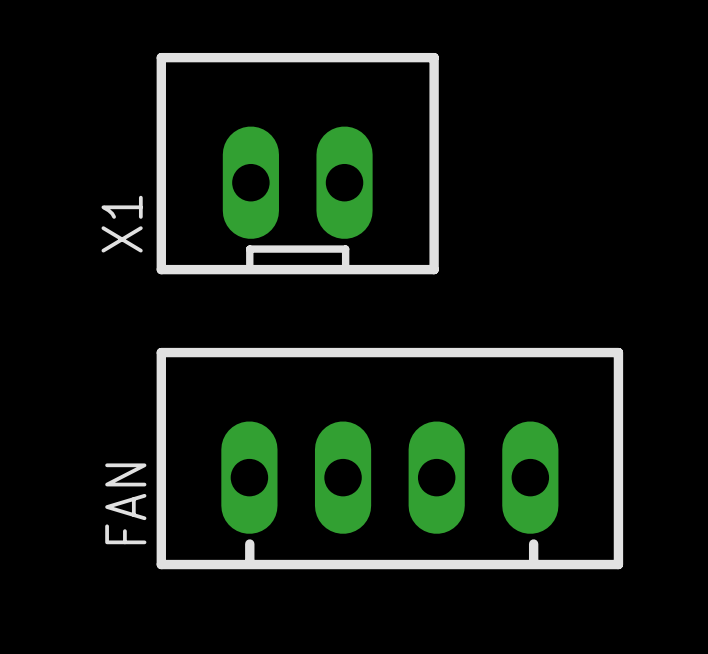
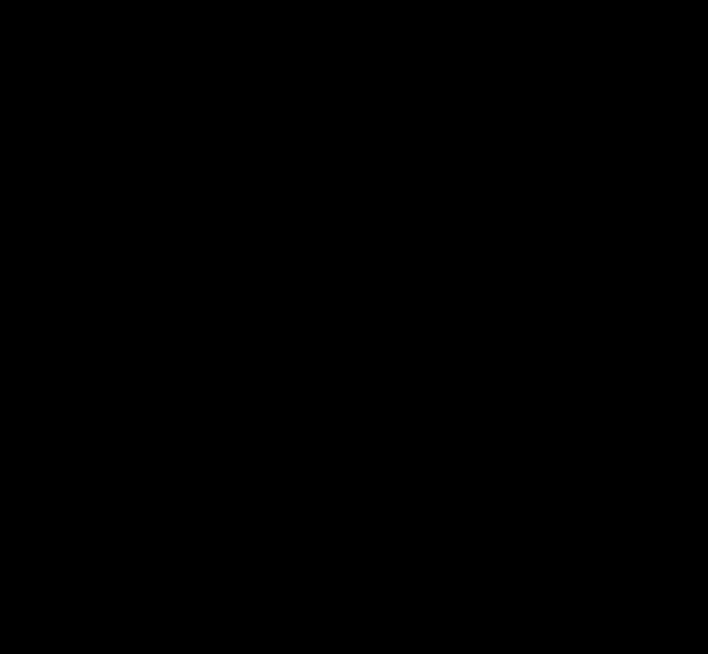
X1: (297, 163) -> none
FAN: (389, 458) -> none

